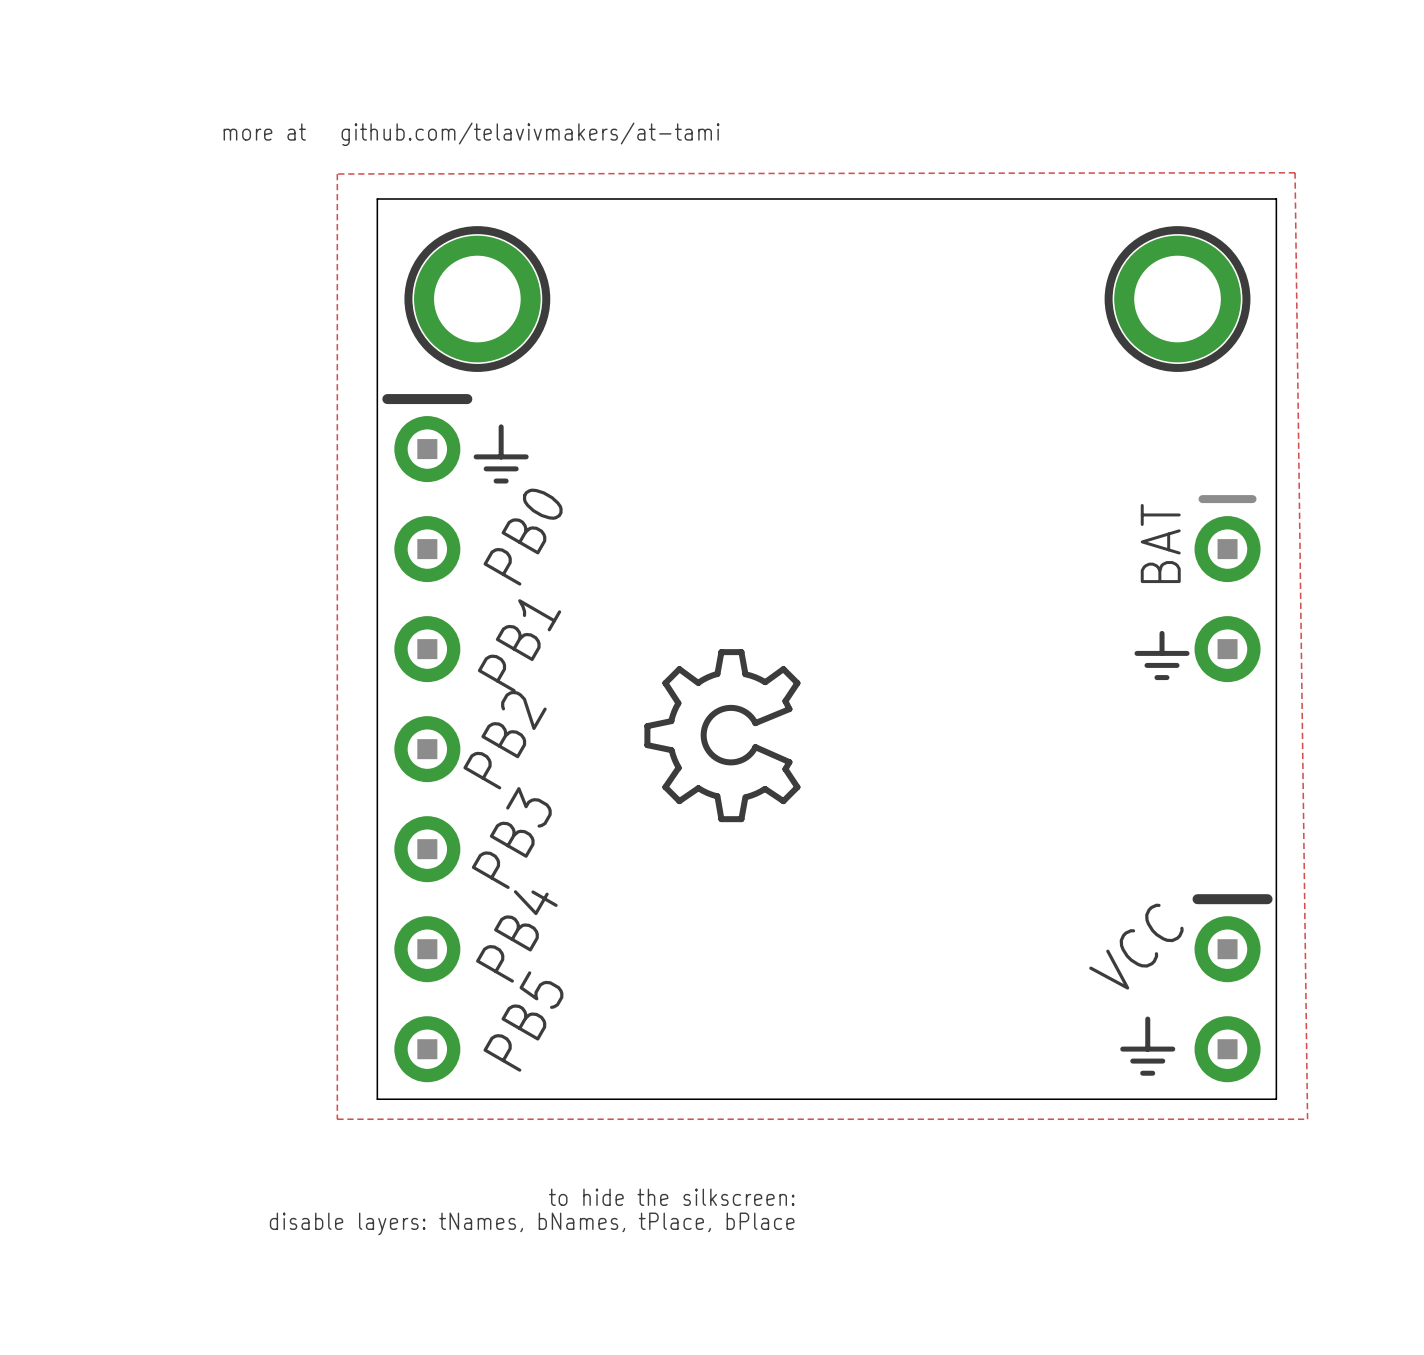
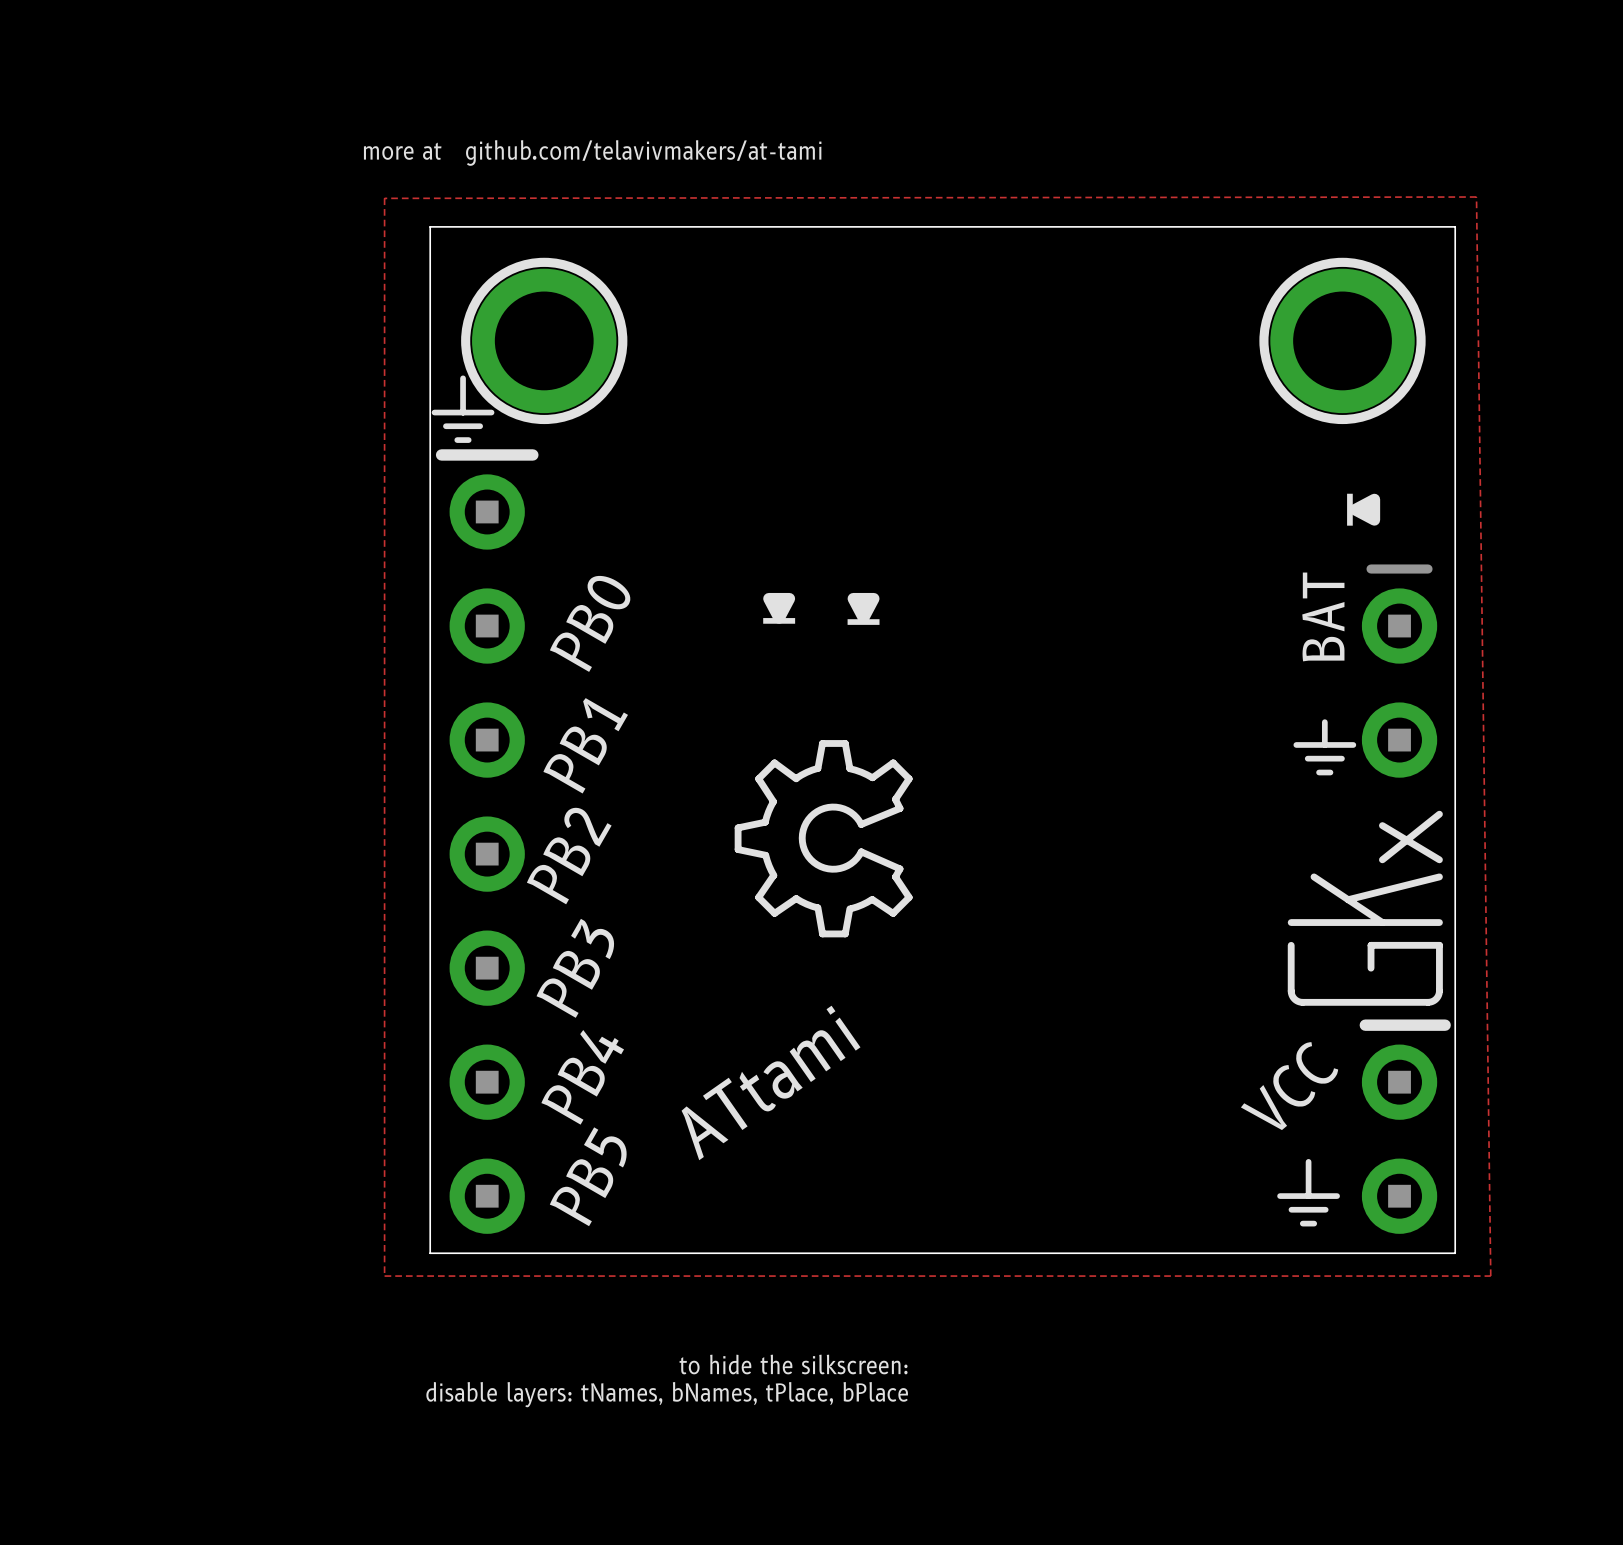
line: (501, 426) (501, 456) -> (463, 378) (463, 412)
drawing: none -> [1347, 493, 1381, 526]
line: (476, 456) (526, 456) -> (434, 412) (491, 412)
line: (486, 468) (516, 468) -> (445, 426) (480, 426)
line: (496, 481) (506, 481) -> (457, 440) (468, 440)
drawing: none -> [763, 592, 880, 625]
line: none -> (1439, 814) (1382, 859)
line: none -> (1382, 825) (1439, 859)
line: none -> (1314, 876) (1382, 922)
line: none -> (1439, 876) (1348, 899)
line: none -> (1291, 922) (1439, 922)
line: none -> (1291, 945) (1291, 992) (1293, 997) (1298, 1001) (1428, 1002) (1433, 1000) (1438, 995) (1439, 945) (1371, 945) (1371, 968)
text: none -> ATtami (771, 1082)

